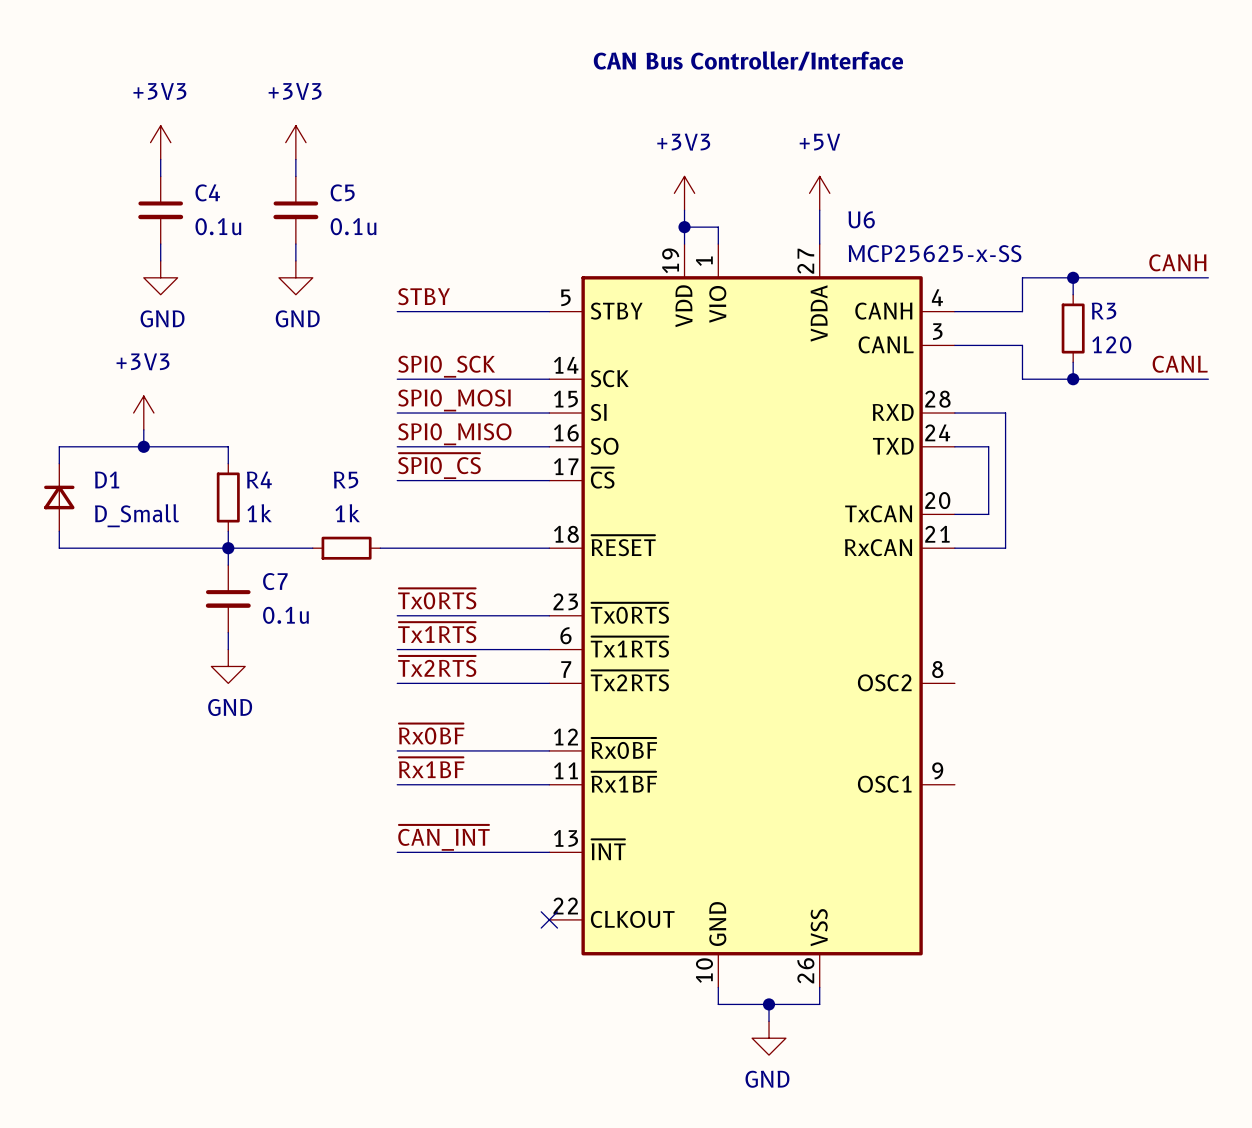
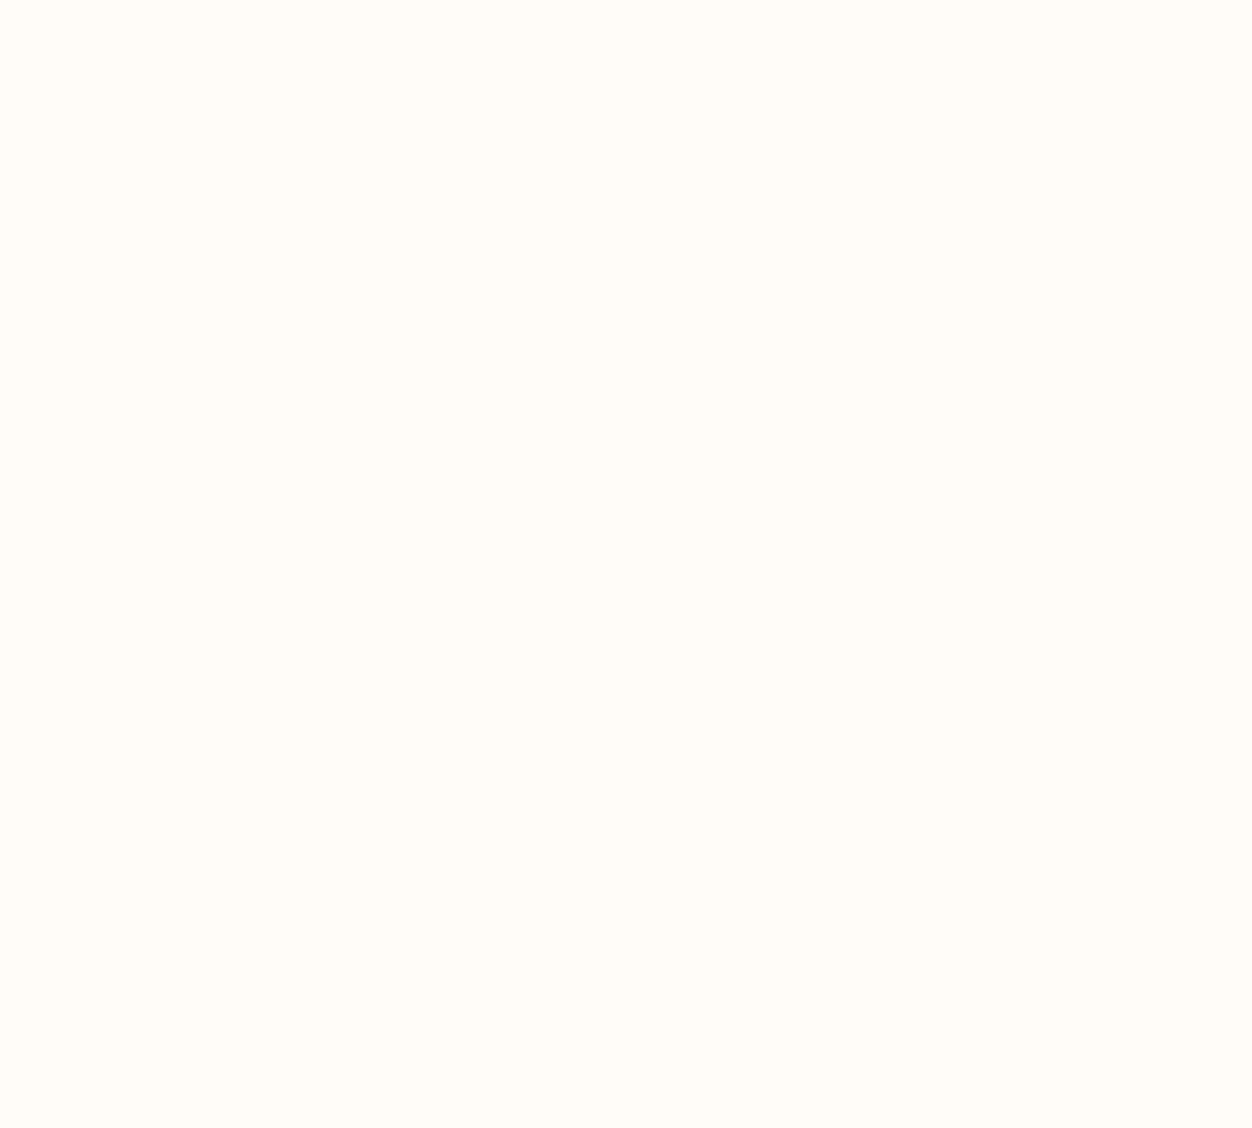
text: CAN Bus Controller/Interface (748, 60) -> none
power symbol: +3V3 (160, 142) -> none
power symbol: +3V3 (295, 142) -> none
wire: (160, 159) (160, 176) -> none
wire: (295, 159) (295, 176) -> none
power symbol: +3V3 (684, 193) -> none
power symbol: +5V (819, 193) -> none
C4: 0.1u (160, 210) -> none
C5: 0.1u (295, 210) -> none
wire: (684, 210) (684, 244) -> none
wire: (819, 210) (819, 244) -> none
wire: (684, 227) (718, 227) (718, 244) -> none
junction: (684, 227) -> none
wire: (160, 244) (160, 260) -> none
wire: (295, 244) (295, 260) -> none
label: CANH (1177, 262) -> none
power symbol: GND (160, 277) -> none
power symbol: GND (295, 277) -> none
wire: (1073, 277) (1073, 294) -> none
junction: (1073, 277) -> none
wire: (1208, 277) (1022, 277) (1022, 311) (954, 311) -> none
label: STBY (424, 296) -> none
wire: (397, 311) (549, 311) -> none
R3: 120 (1073, 328) -> none
wire: (954, 345) (1022, 345) (1022, 379) (1208, 379) -> none
wire: (1073, 362) (1073, 379) -> none
label: CANL (1180, 364) -> none
label: SPI0_SCK (446, 366) -> none
wire: (397, 379) (549, 379) -> none
junction: (1073, 379) -> none
label: SPI0_MOSI (454, 400) -> none
power symbol: +3V3 (143, 413) -> none
wire: (397, 413) (549, 413) -> none
wire: (954, 413) (1005, 413) (1005, 548) (954, 548) -> none
wire: (143, 429) (143, 446) -> none
label: SPI0_MISO (454, 434) -> none
junction: (143, 446) -> none
wire: (397, 446) (549, 446) -> none
wire: (954, 446) (988, 446) (988, 514) (954, 514) -> none
wire: (59, 463) (59, 446) (228, 446) (228, 463) -> none
label: ~{SPI0_CS} (439, 466) -> none
wire: (397, 480) (549, 480) -> none
D1: D_Small (59, 497) -> none
R4: 1k (228, 497) -> none
wire: (59, 531) (59, 548) (312, 548) -> none
wire: (228, 531) (228, 565) -> none
junction: (228, 548) -> none
R5: 1k (346, 548) -> none
wire: (380, 548) (549, 548) -> none
C7: 0.1u (228, 598) -> none
label: ~{Tx0RTS} (437, 598) -> none
wire: (397, 615) (549, 615) -> none
U6: MCP25625-x-SS (752, 615) -> none
wire: (228, 632) (228, 649) -> none
label: ~{Tx1RTS} (437, 632) -> none
wire: (397, 649) (549, 649) -> none
power symbol: GND (228, 666) -> none
label: ~{Tx2RTS} (437, 666) -> none
wire: (397, 683) (549, 683) -> none
label: ~{Rx0BF} (431, 734) -> none
wire: (397, 750) (549, 750) -> none
label: ~{Rx1BF} (431, 767) -> none
wire: (397, 784) (549, 784) -> none
label: ~{CAN_INT} (443, 837) -> none
wire: (397, 852) (549, 852) -> none
no-connect mark: (549, 919) -> none
wire: (718, 987) (718, 1004) (819, 1004) (819, 987) -> none
wire: (769, 1004) (769, 1021) -> none
junction: (769, 1004) -> none
power symbol: GND (769, 1038) -> none

